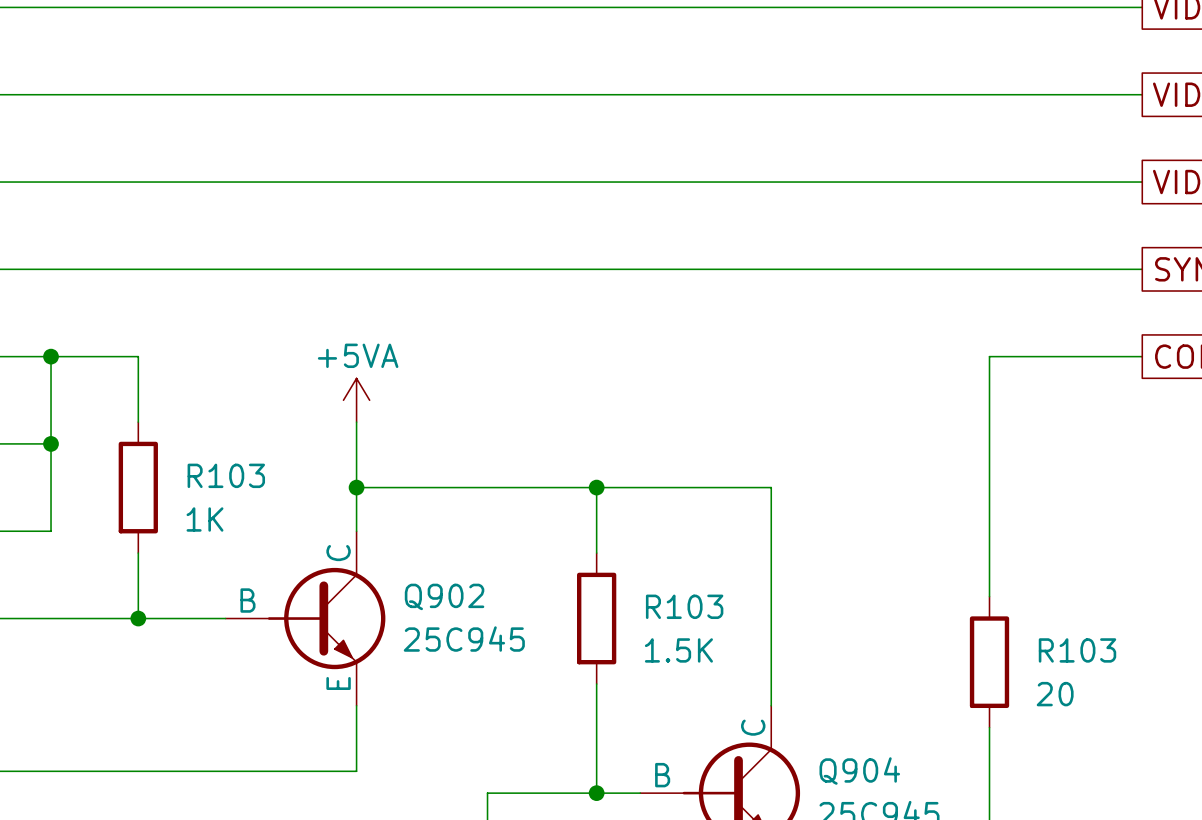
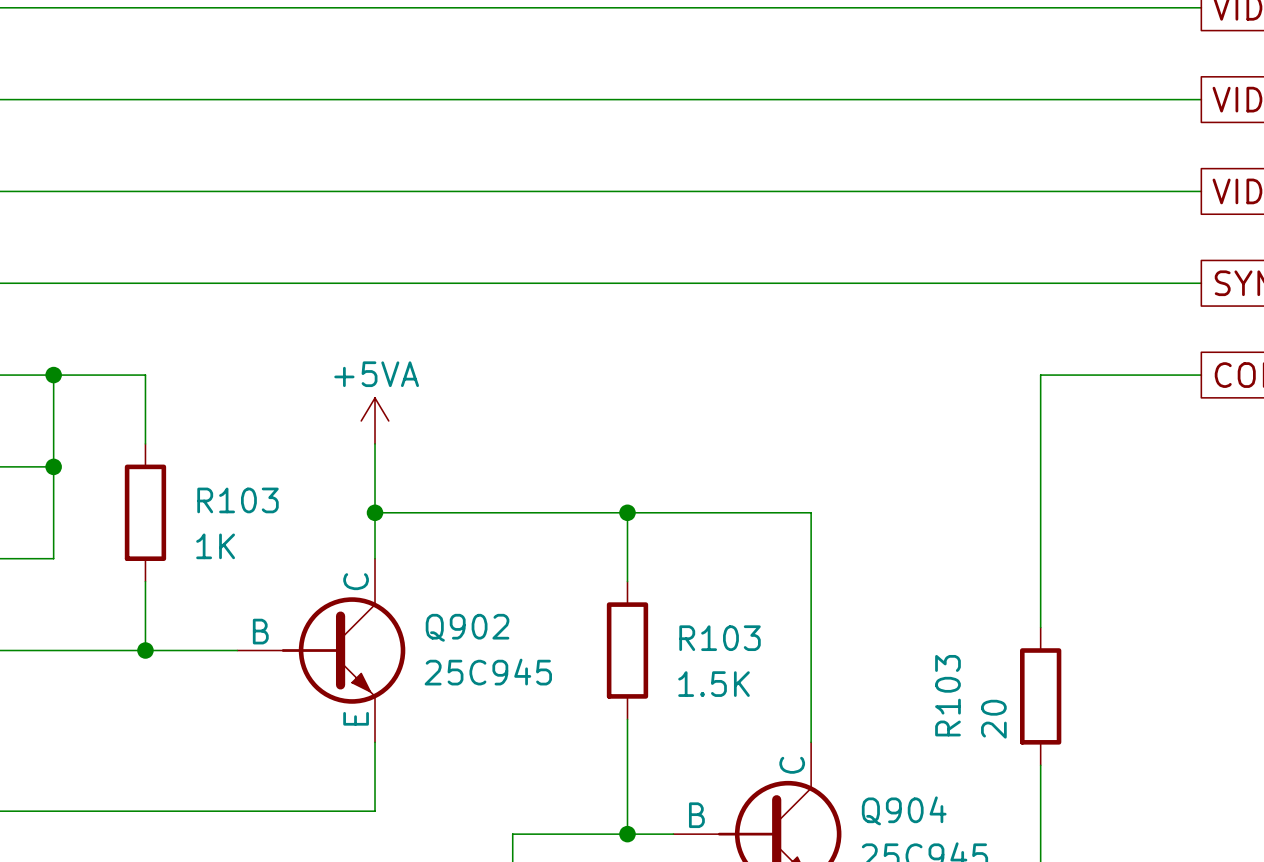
R103 name rotation: 0° (1077, 650) -> 90° counterclockwise (947, 695)
R103 name position: R103 (1077, 650) -> R103 (947, 695)
R103 value rotation: 0° (1055, 694) -> 90° counterclockwise (993, 719)
R103 value position: 20 (1055, 694) -> 20 (993, 719)

